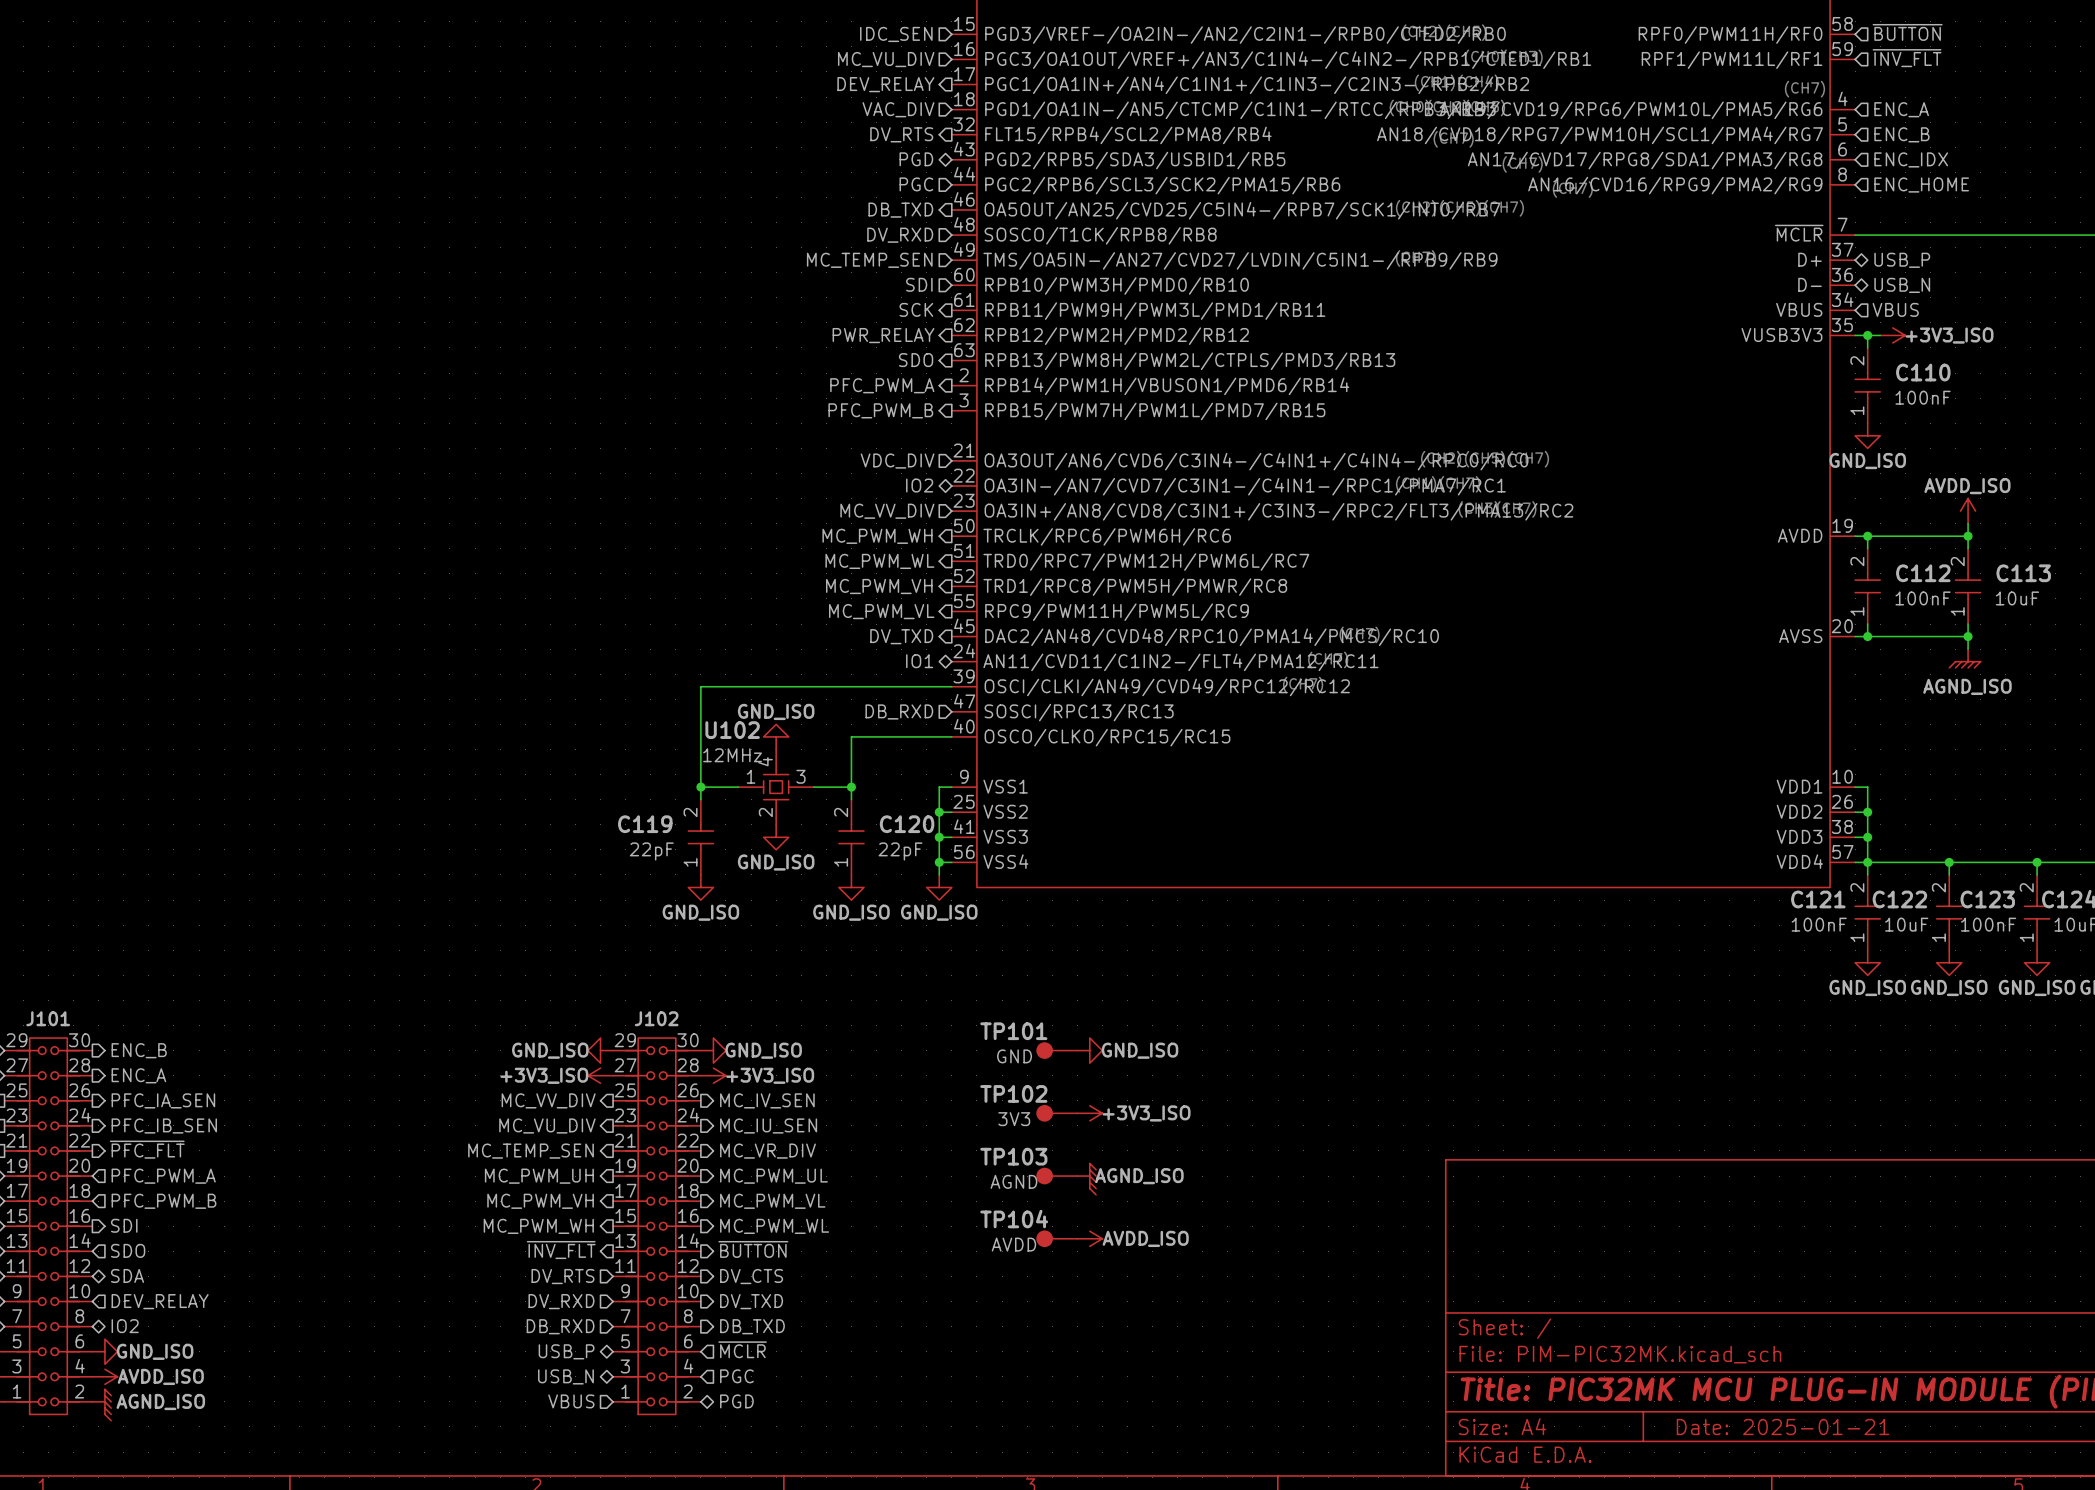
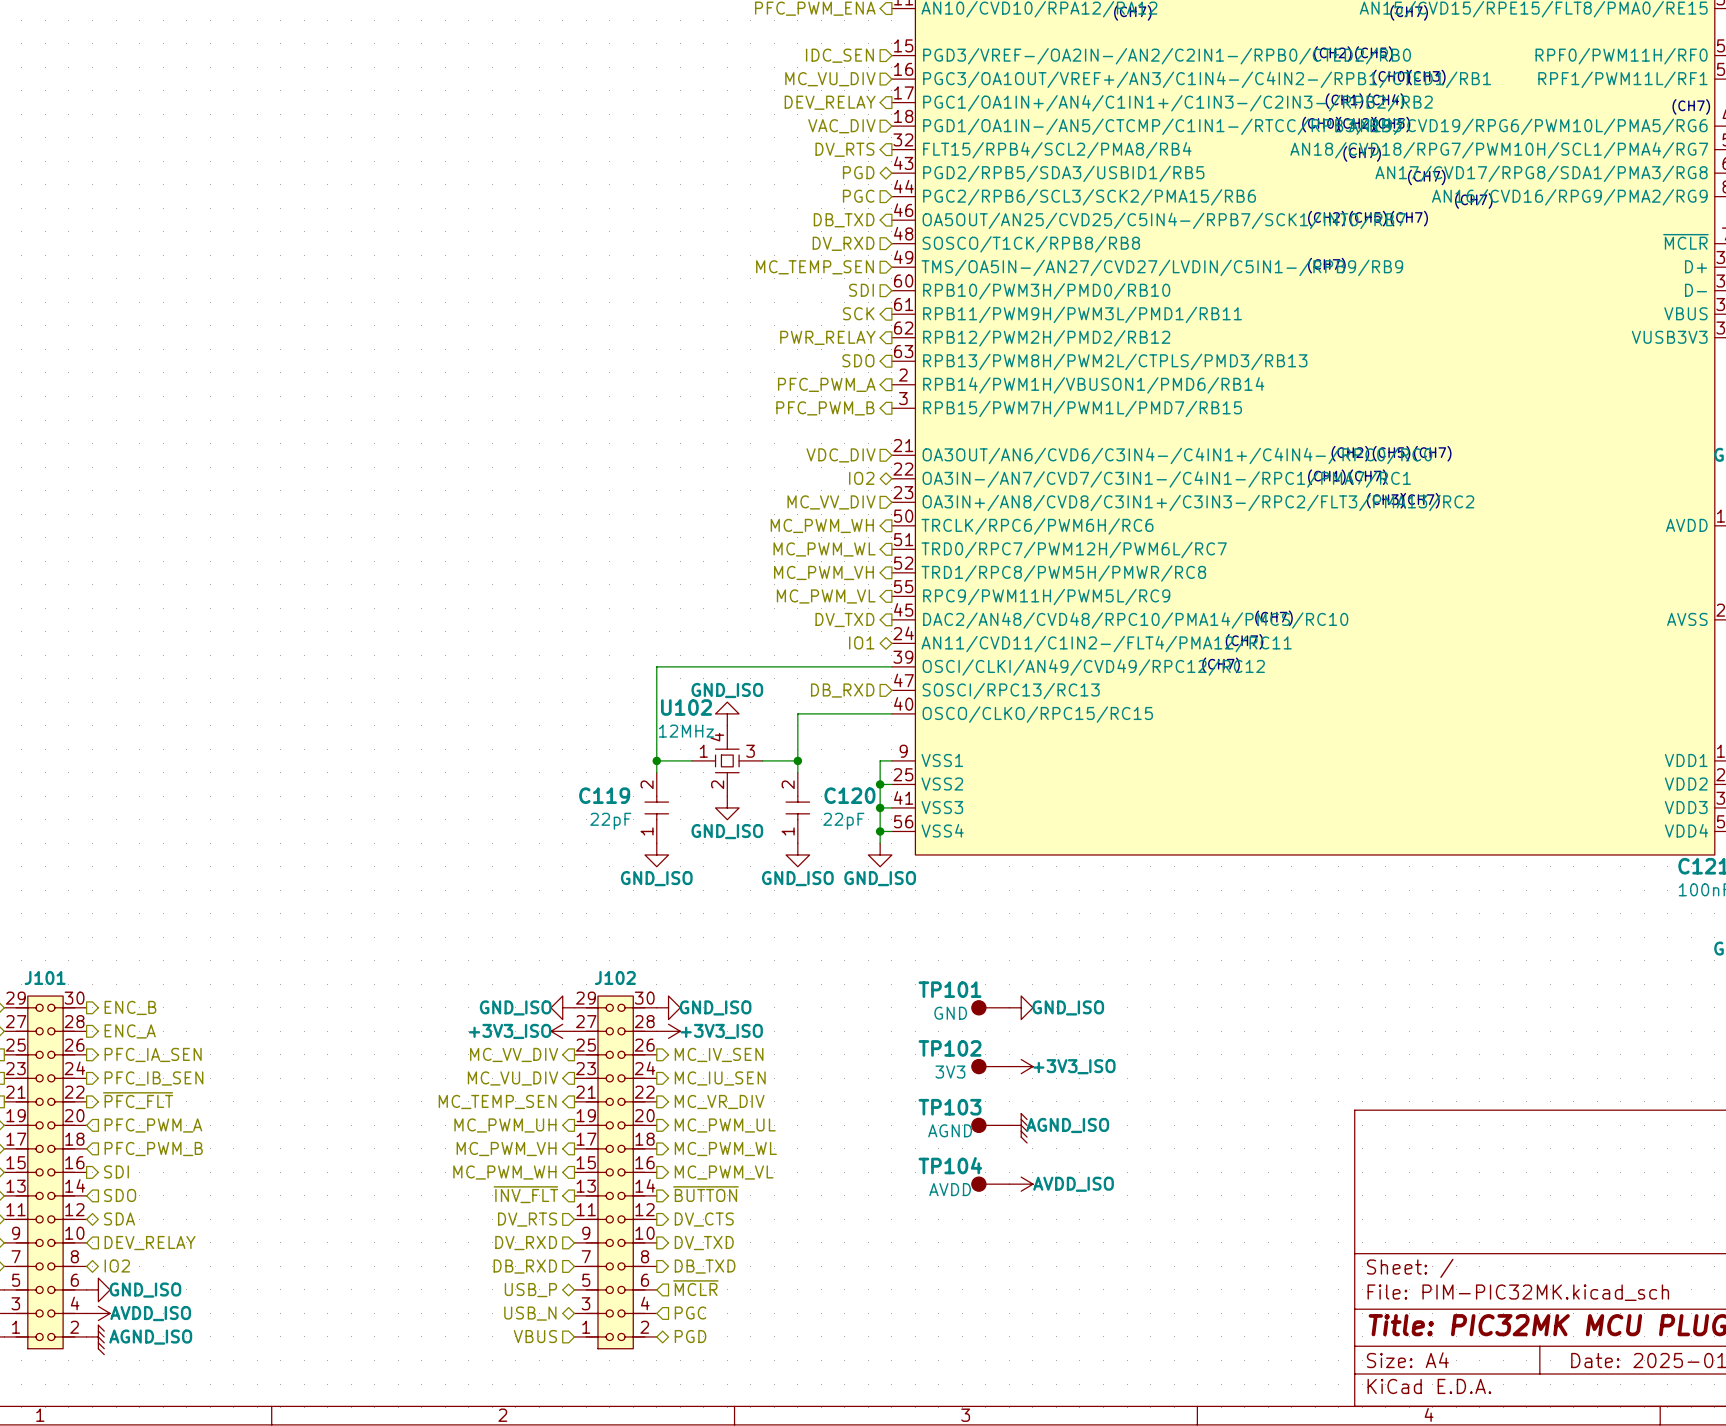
hierarchical label: MC_PWM_VL (772, 1201) -> MC_PWM_WL (725, 1149)
hierarchical label: MC_PWM_WL (774, 1226) -> MC_PWM_VL (724, 1172)

